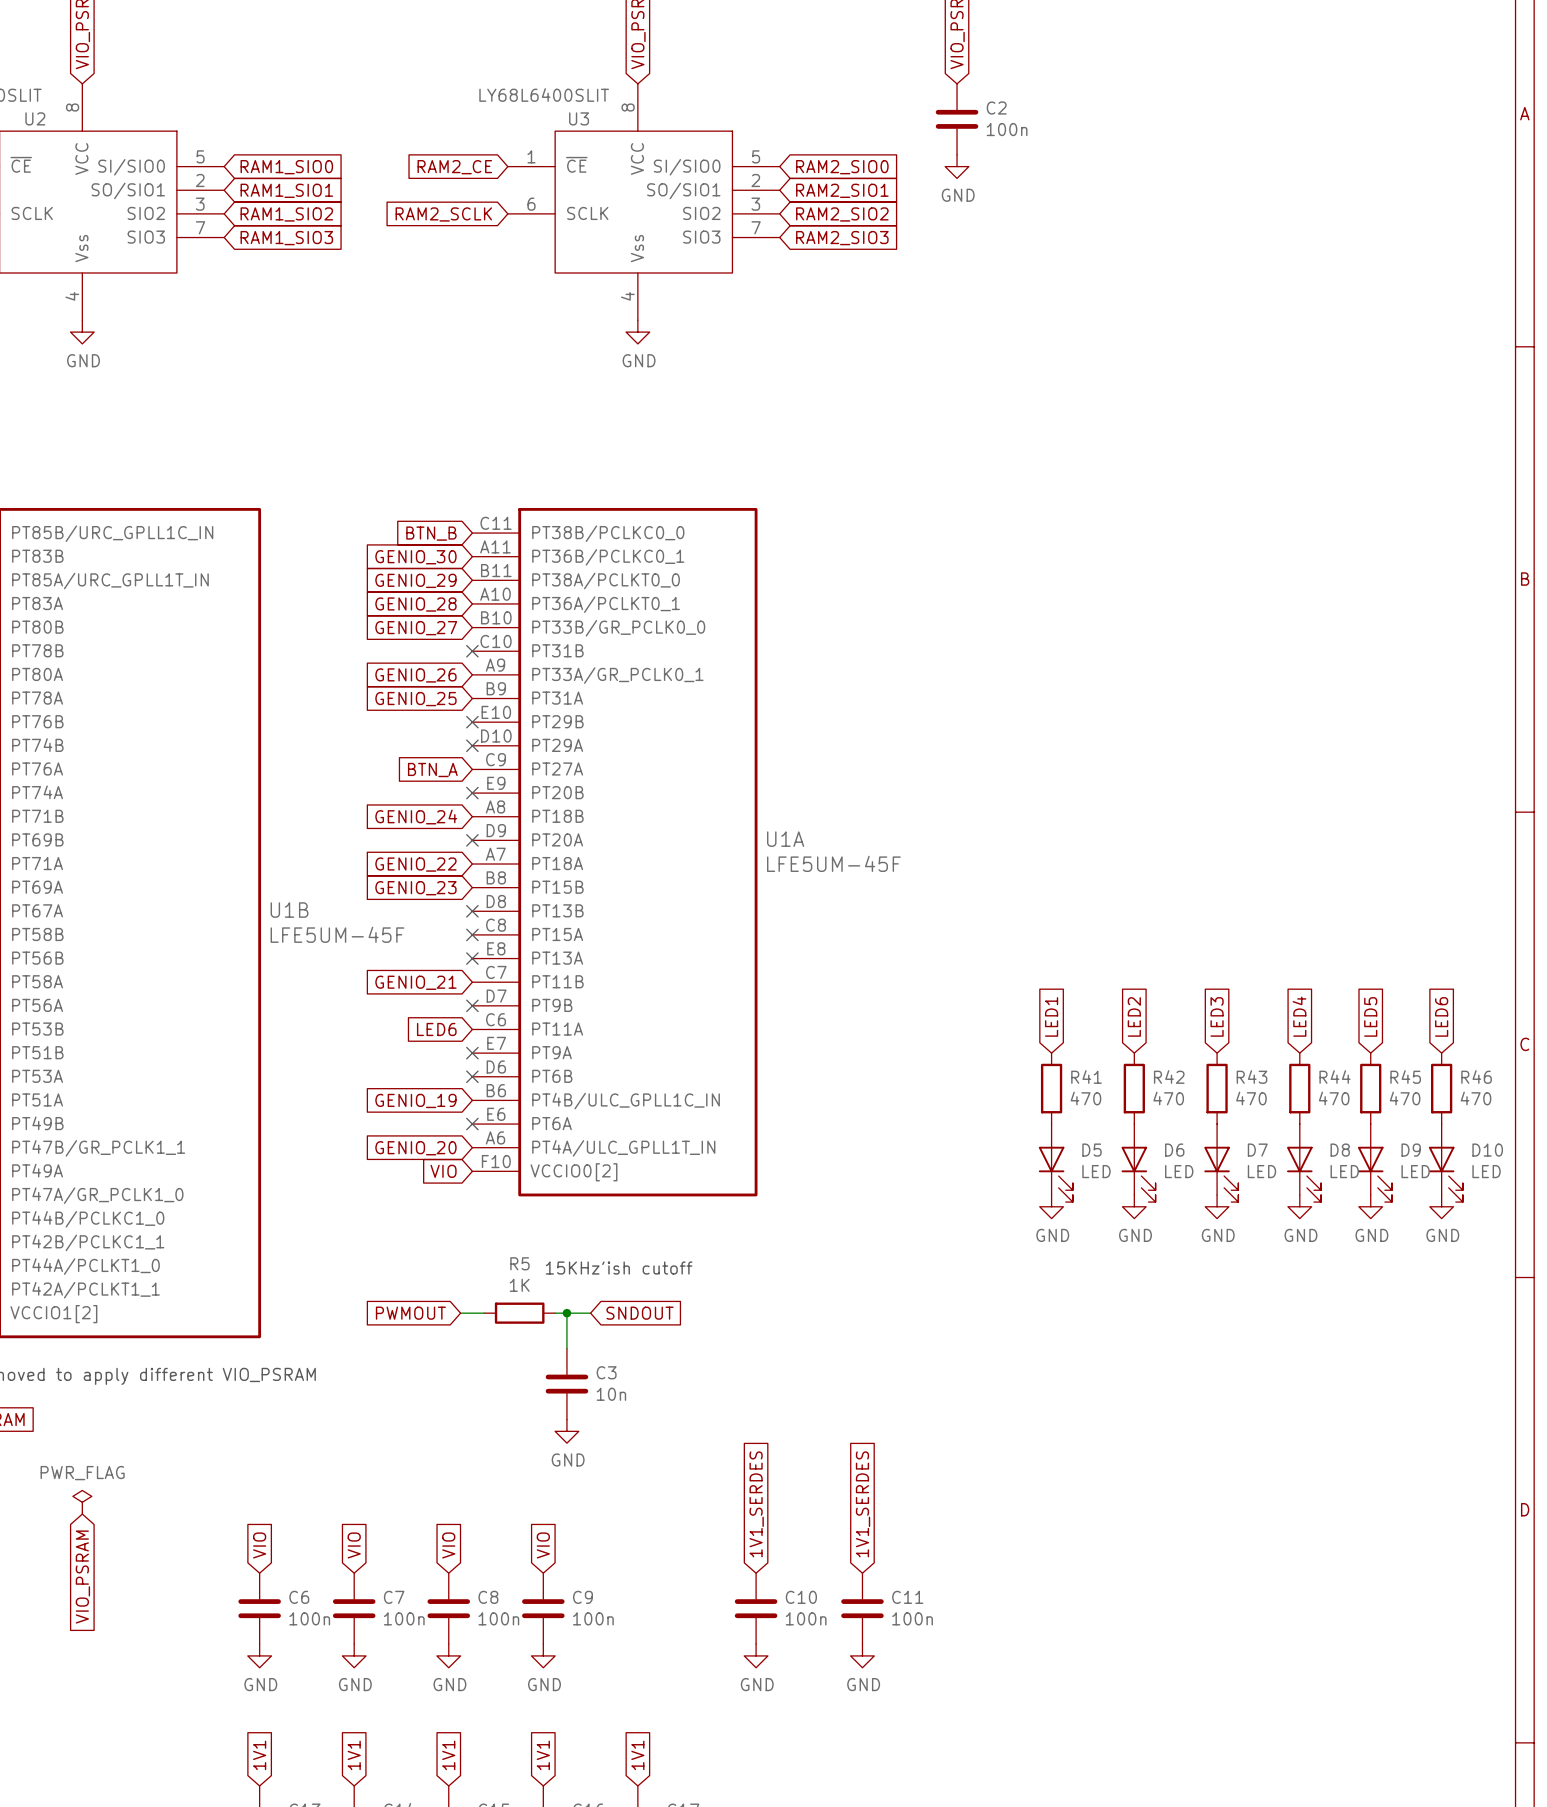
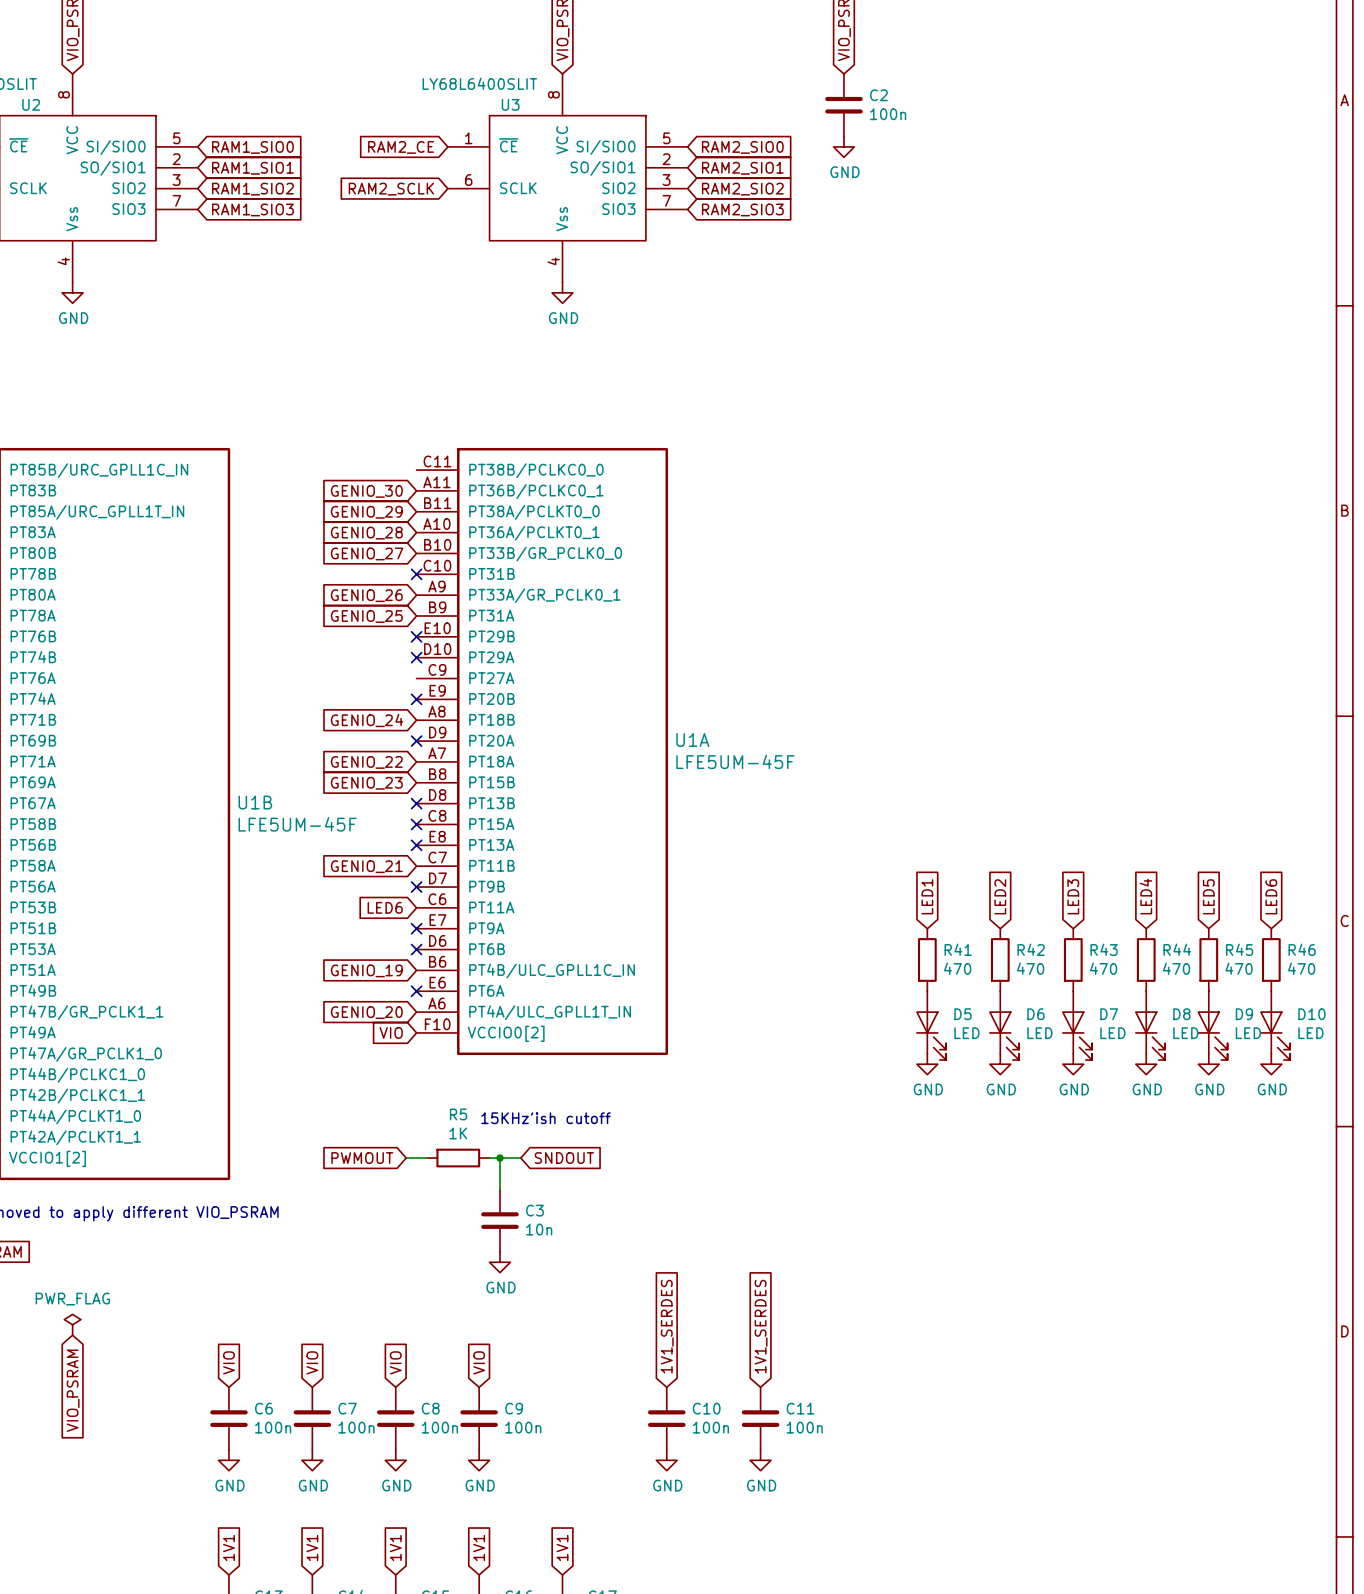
global label: BTN_B (431, 533) -> none
global label: BTN_A (432, 770) -> none

